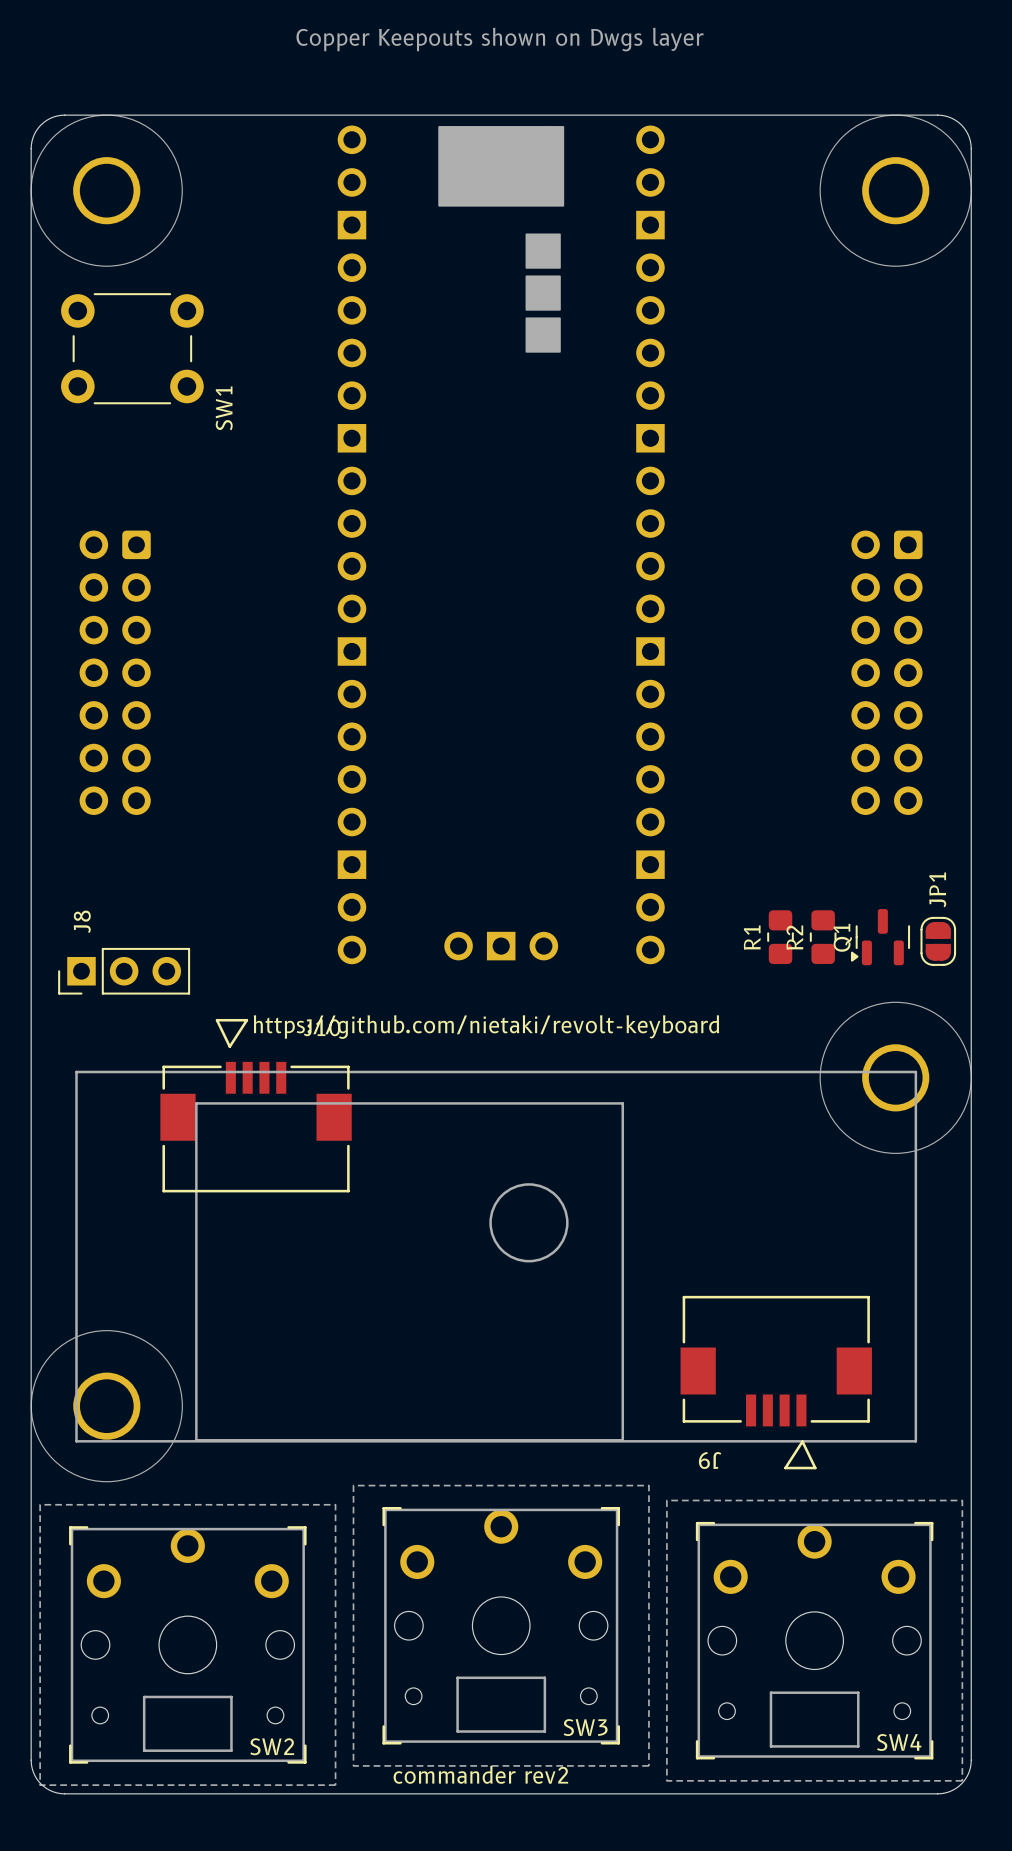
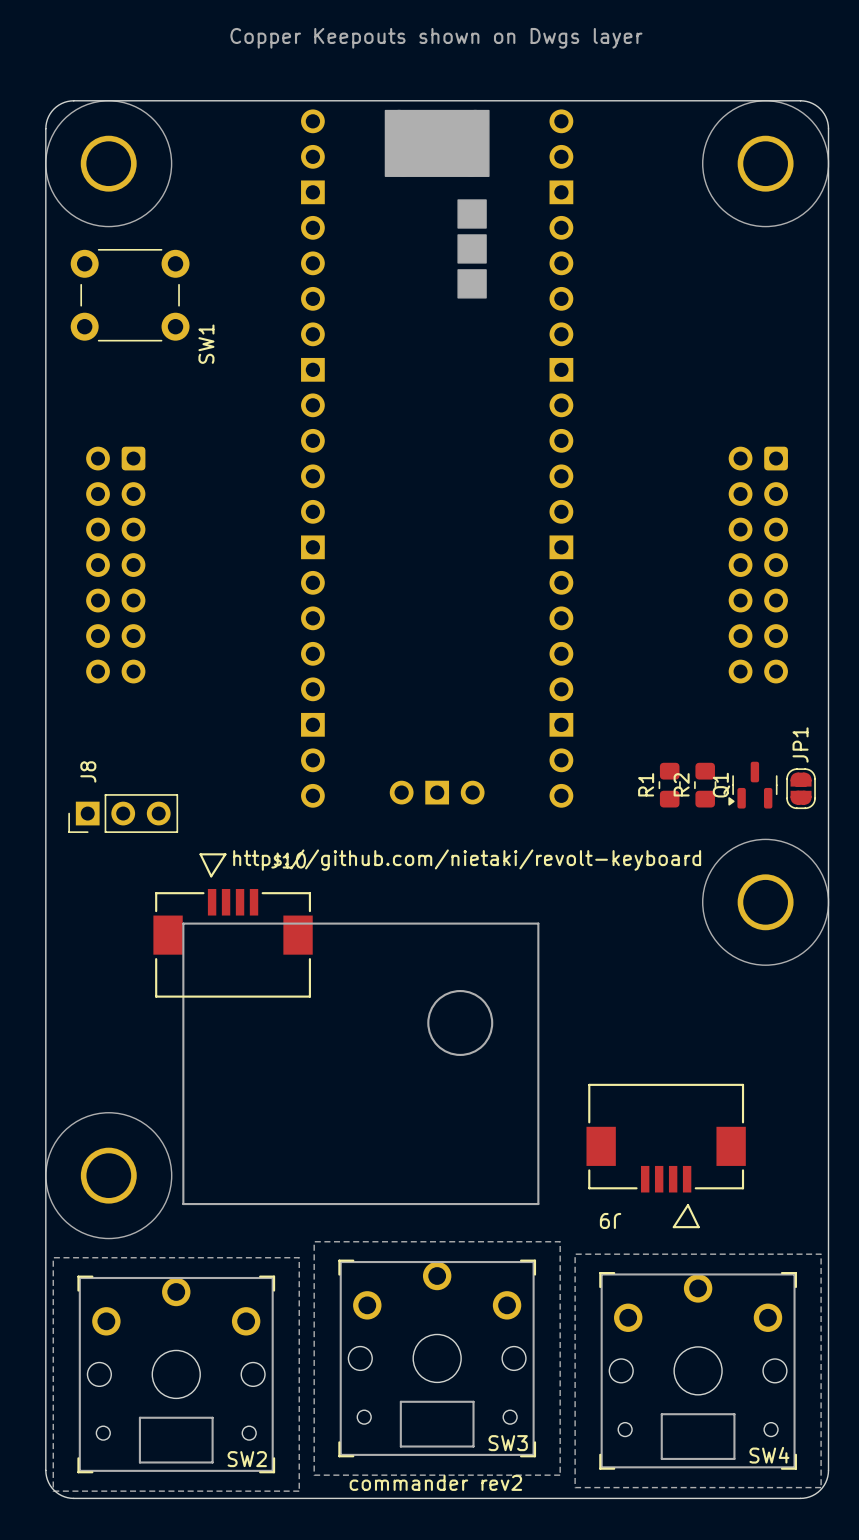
line: (76, 1072) (915, 1072) (915, 1441) (76, 1441) (76, 1072) -> none

